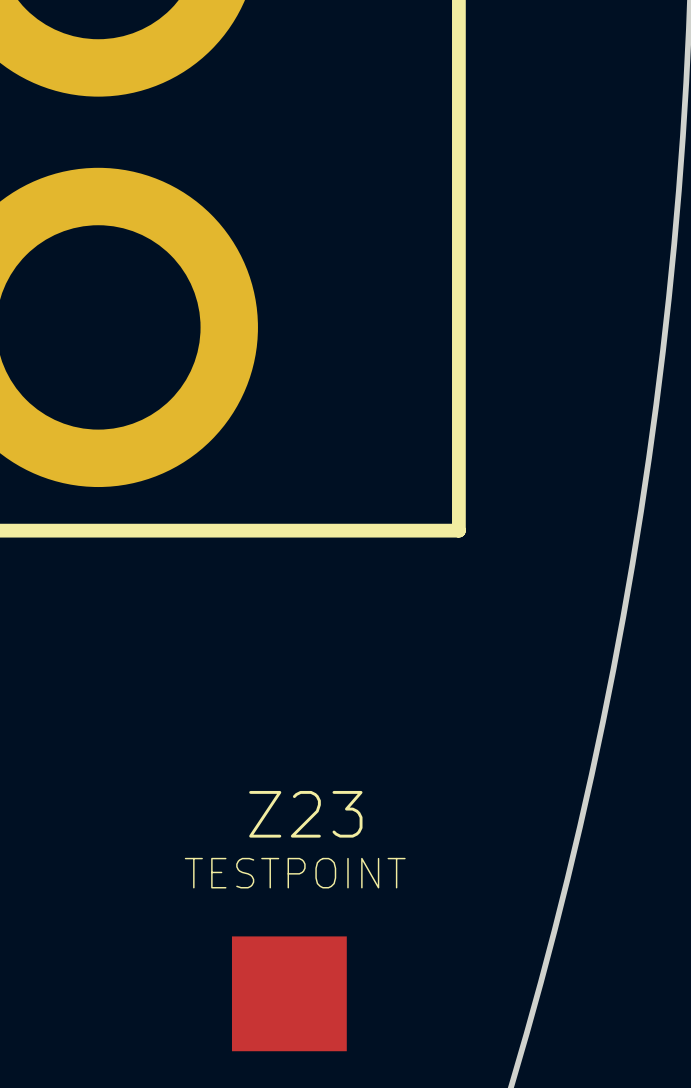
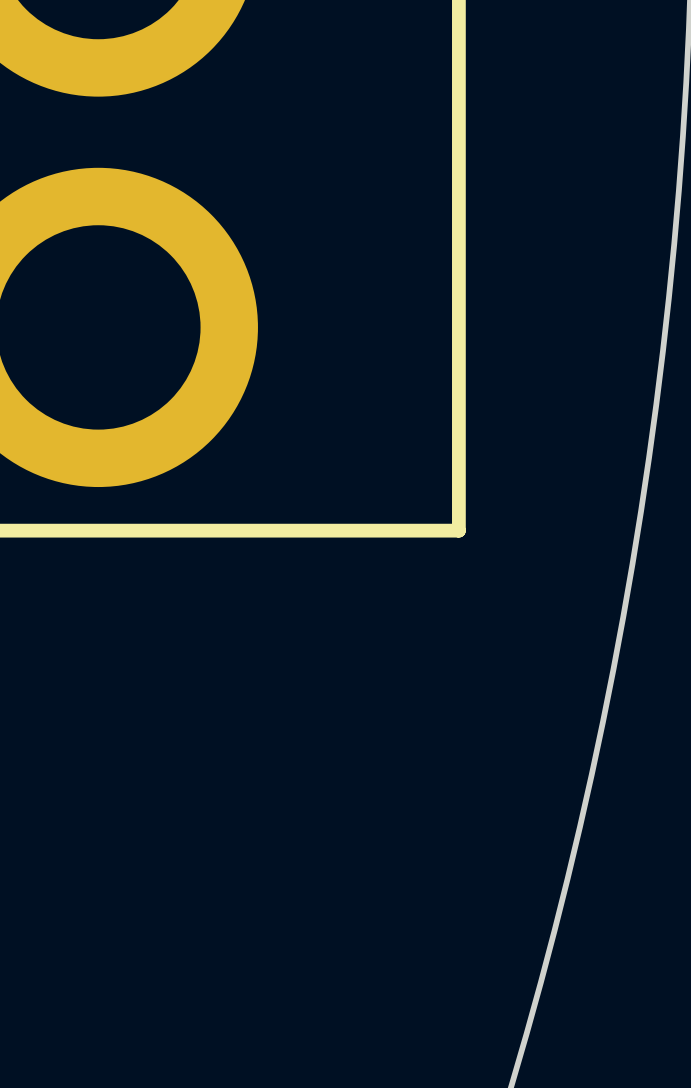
Z23: TESTPOINT (289, 993) -> none

